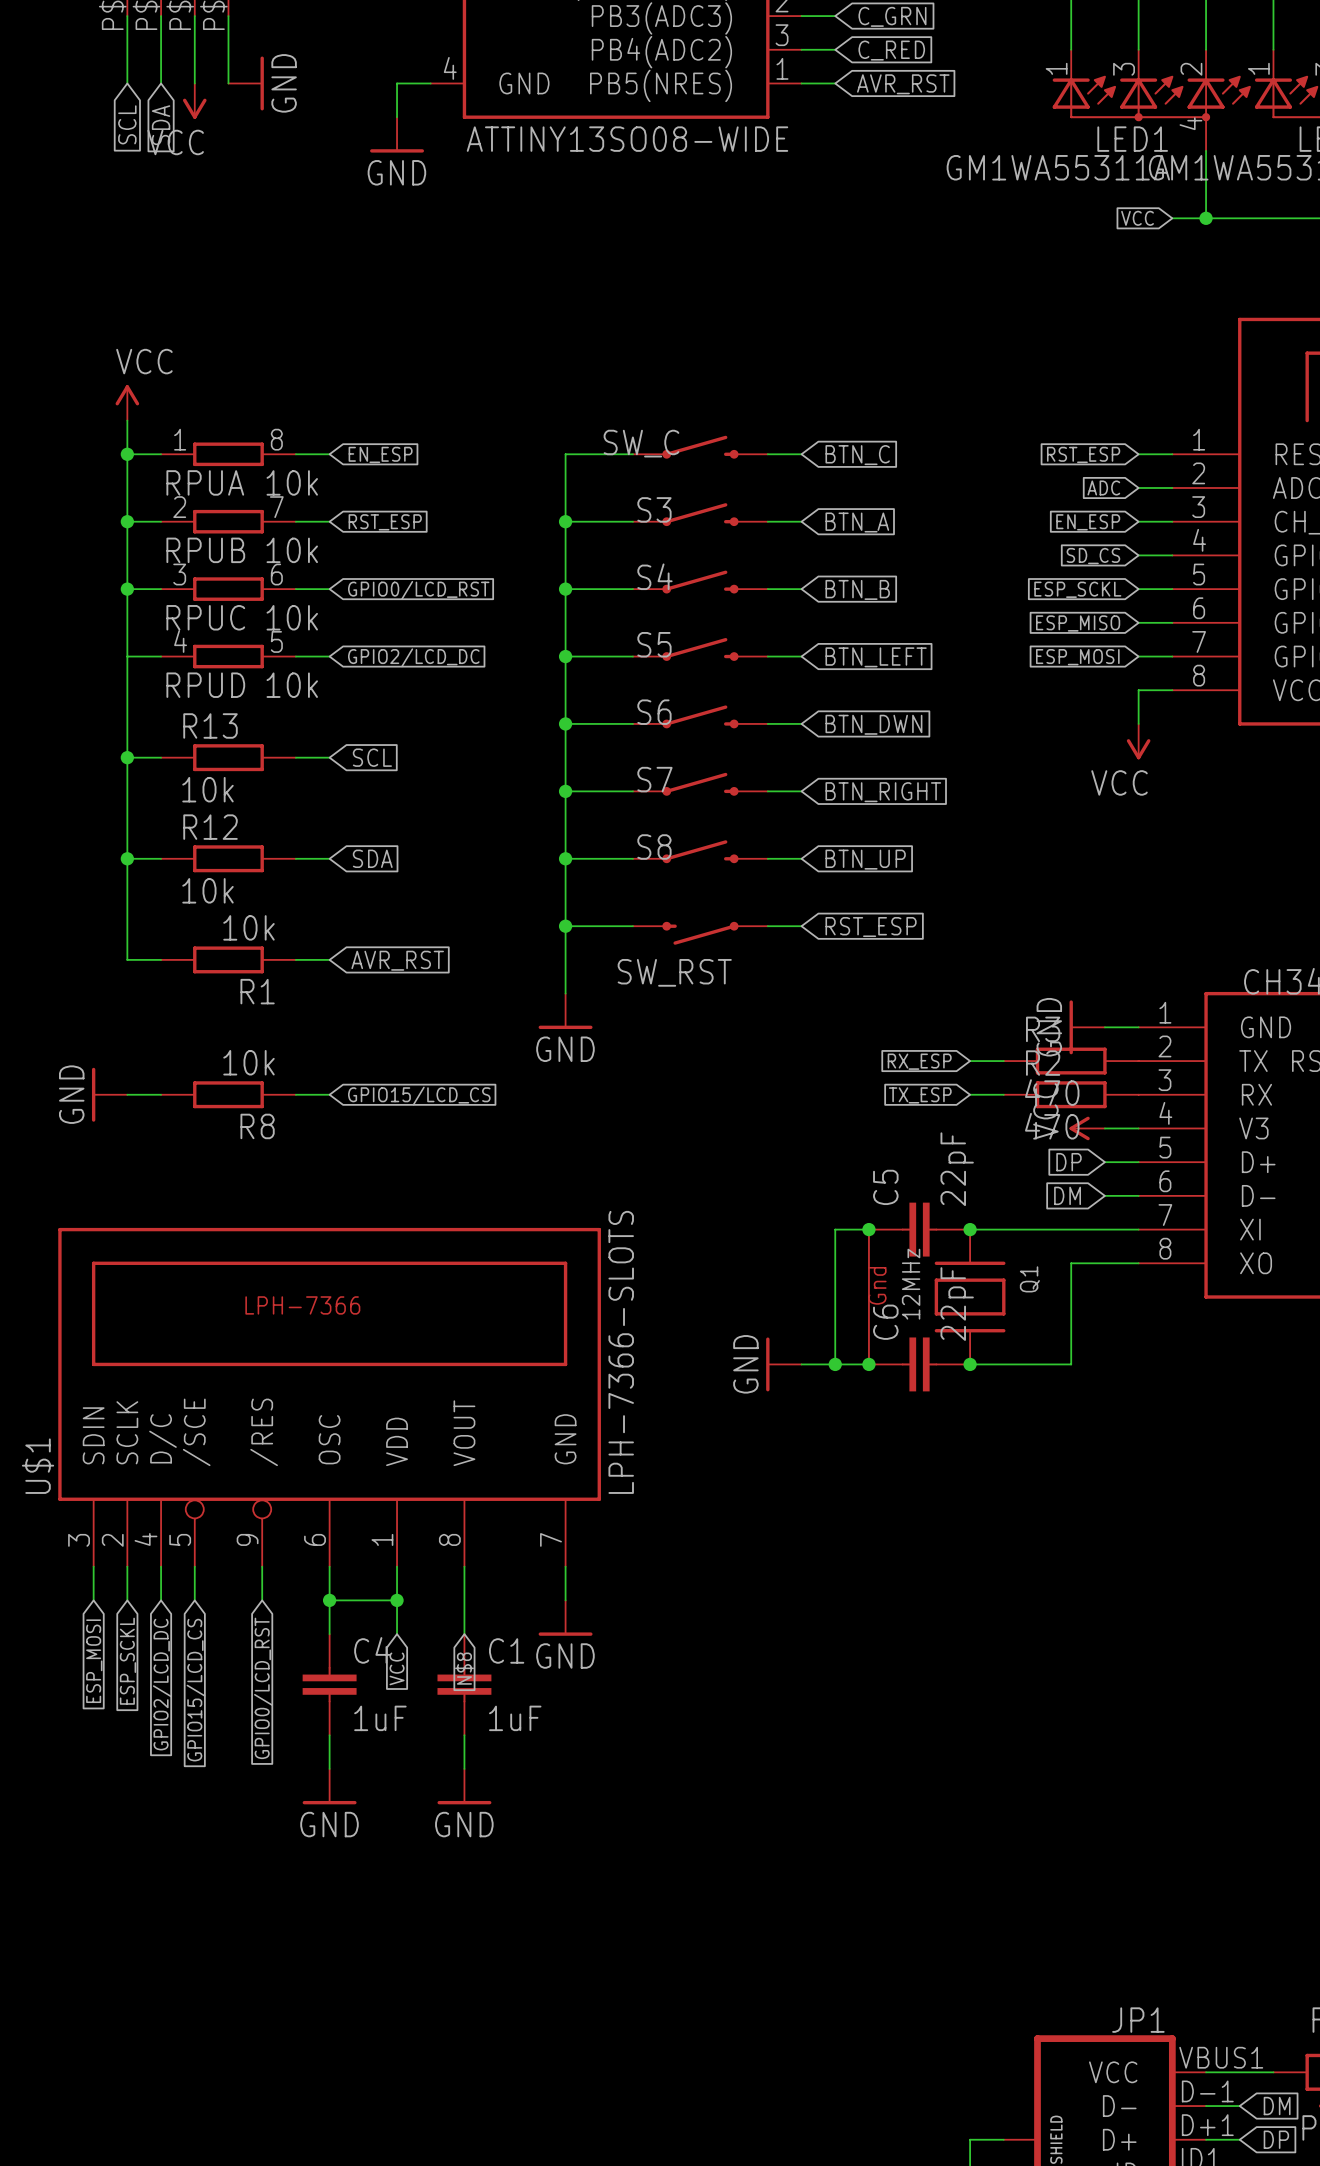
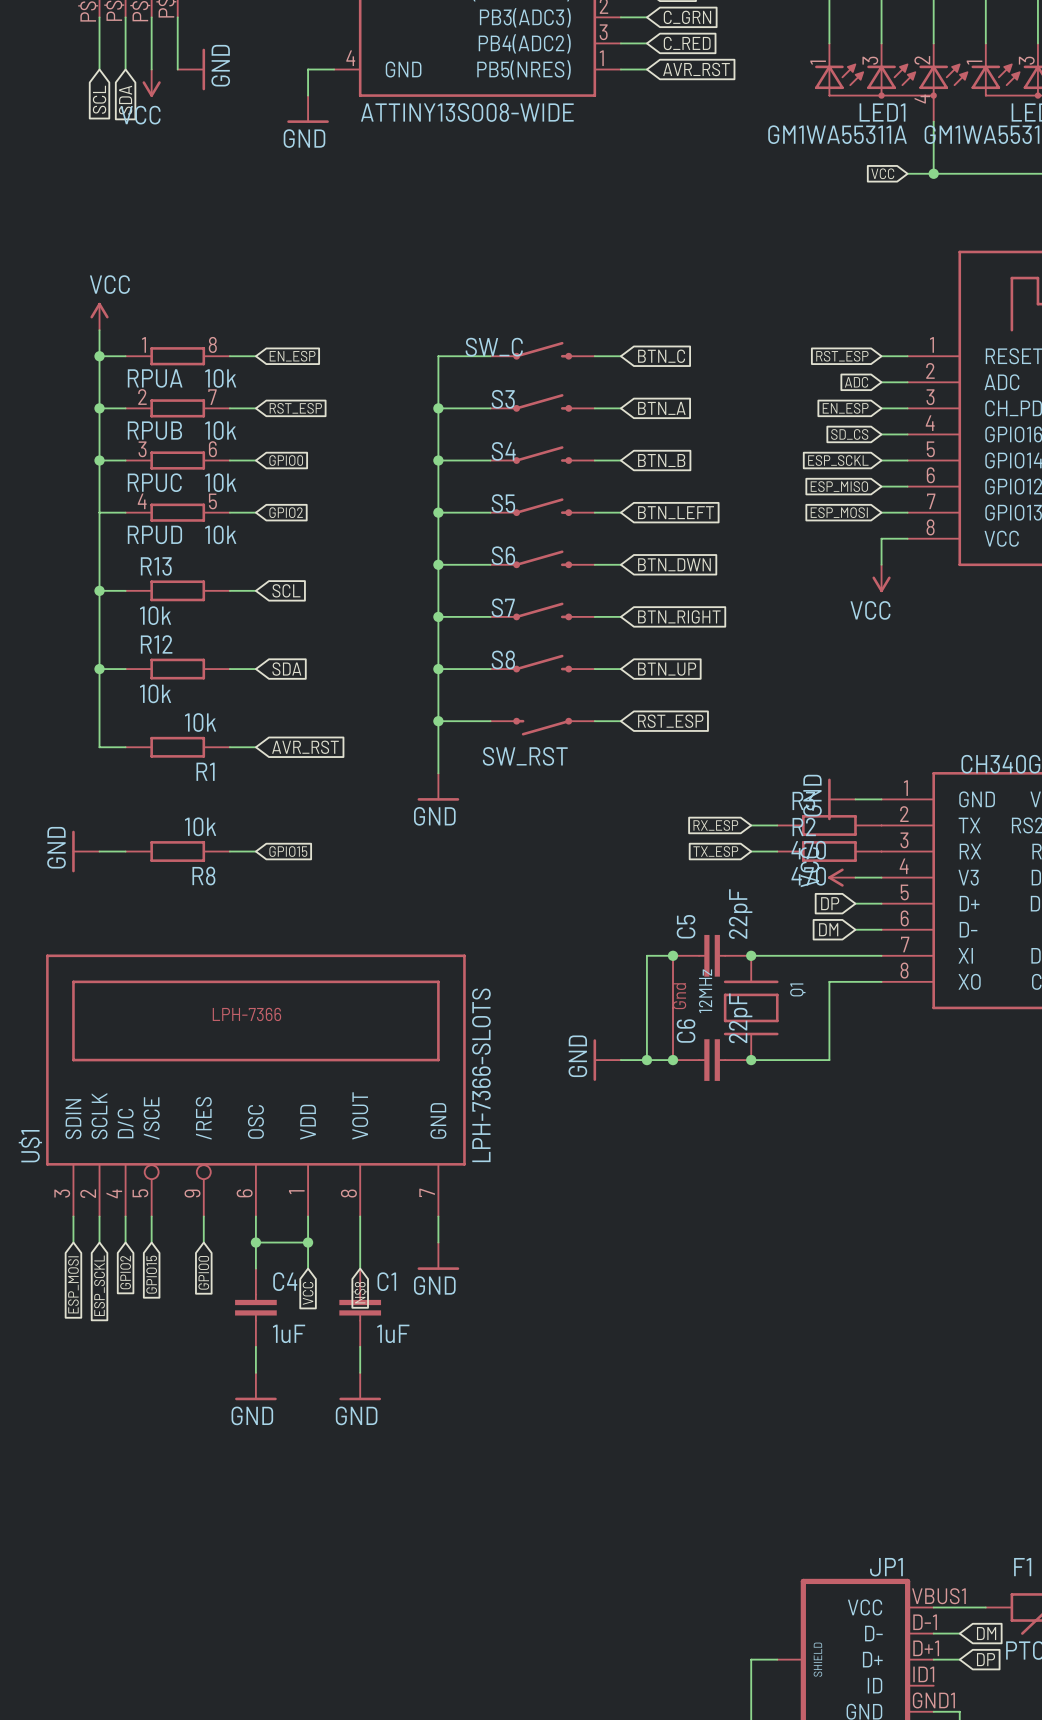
global label: GPIO0/LCD_RST (418, 590) -> GPIO0 (286, 460)
global label: GPIO2/LCD_DC (413, 657) -> GPIO2 (286, 512)
global label: GPIO15/LCD_CS (419, 1096) -> GPIO15 (288, 851)
global label: GPIO2/LCD_DC (162, 1684) -> GPIO2 (125, 1272)
global label: GPIO0/LCD_RST (263, 1688) -> GPIO0 (203, 1272)
global label: GPIO15/LCD_CS (196, 1690) -> GPIO15 (151, 1274)

